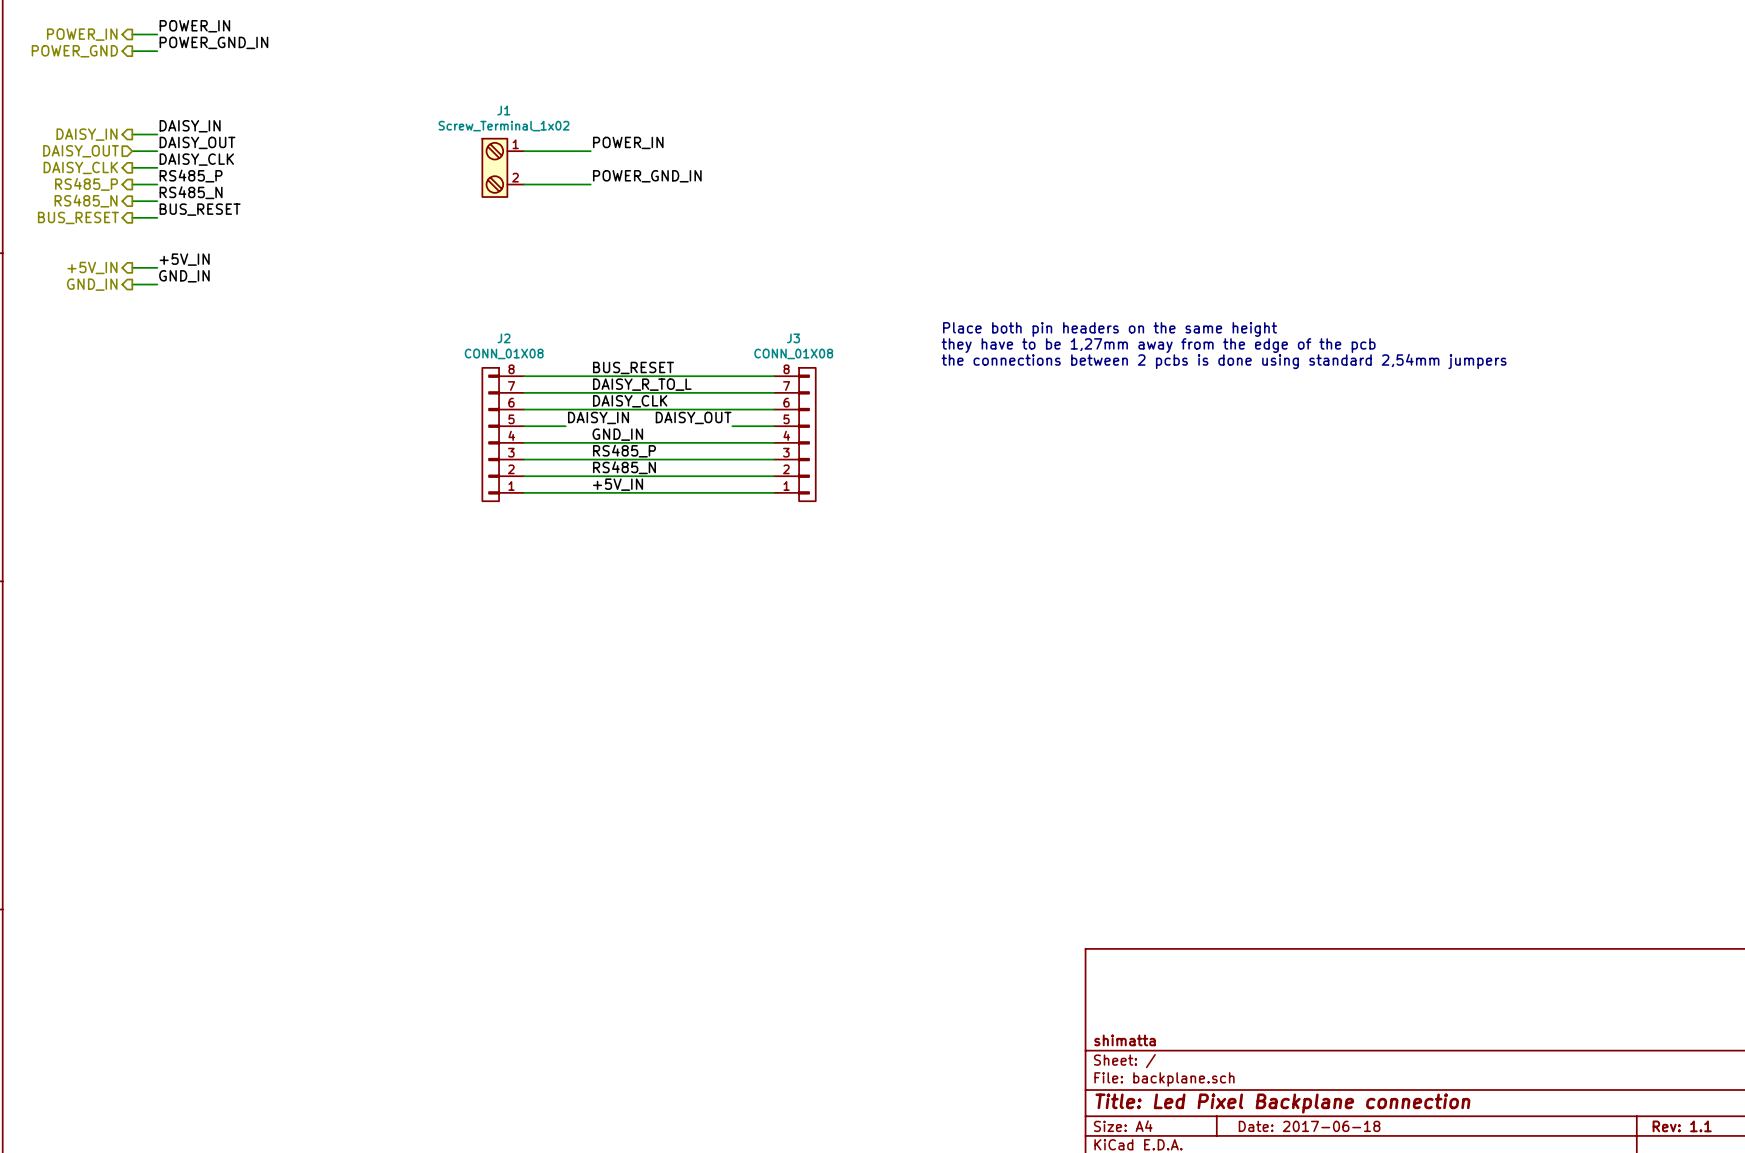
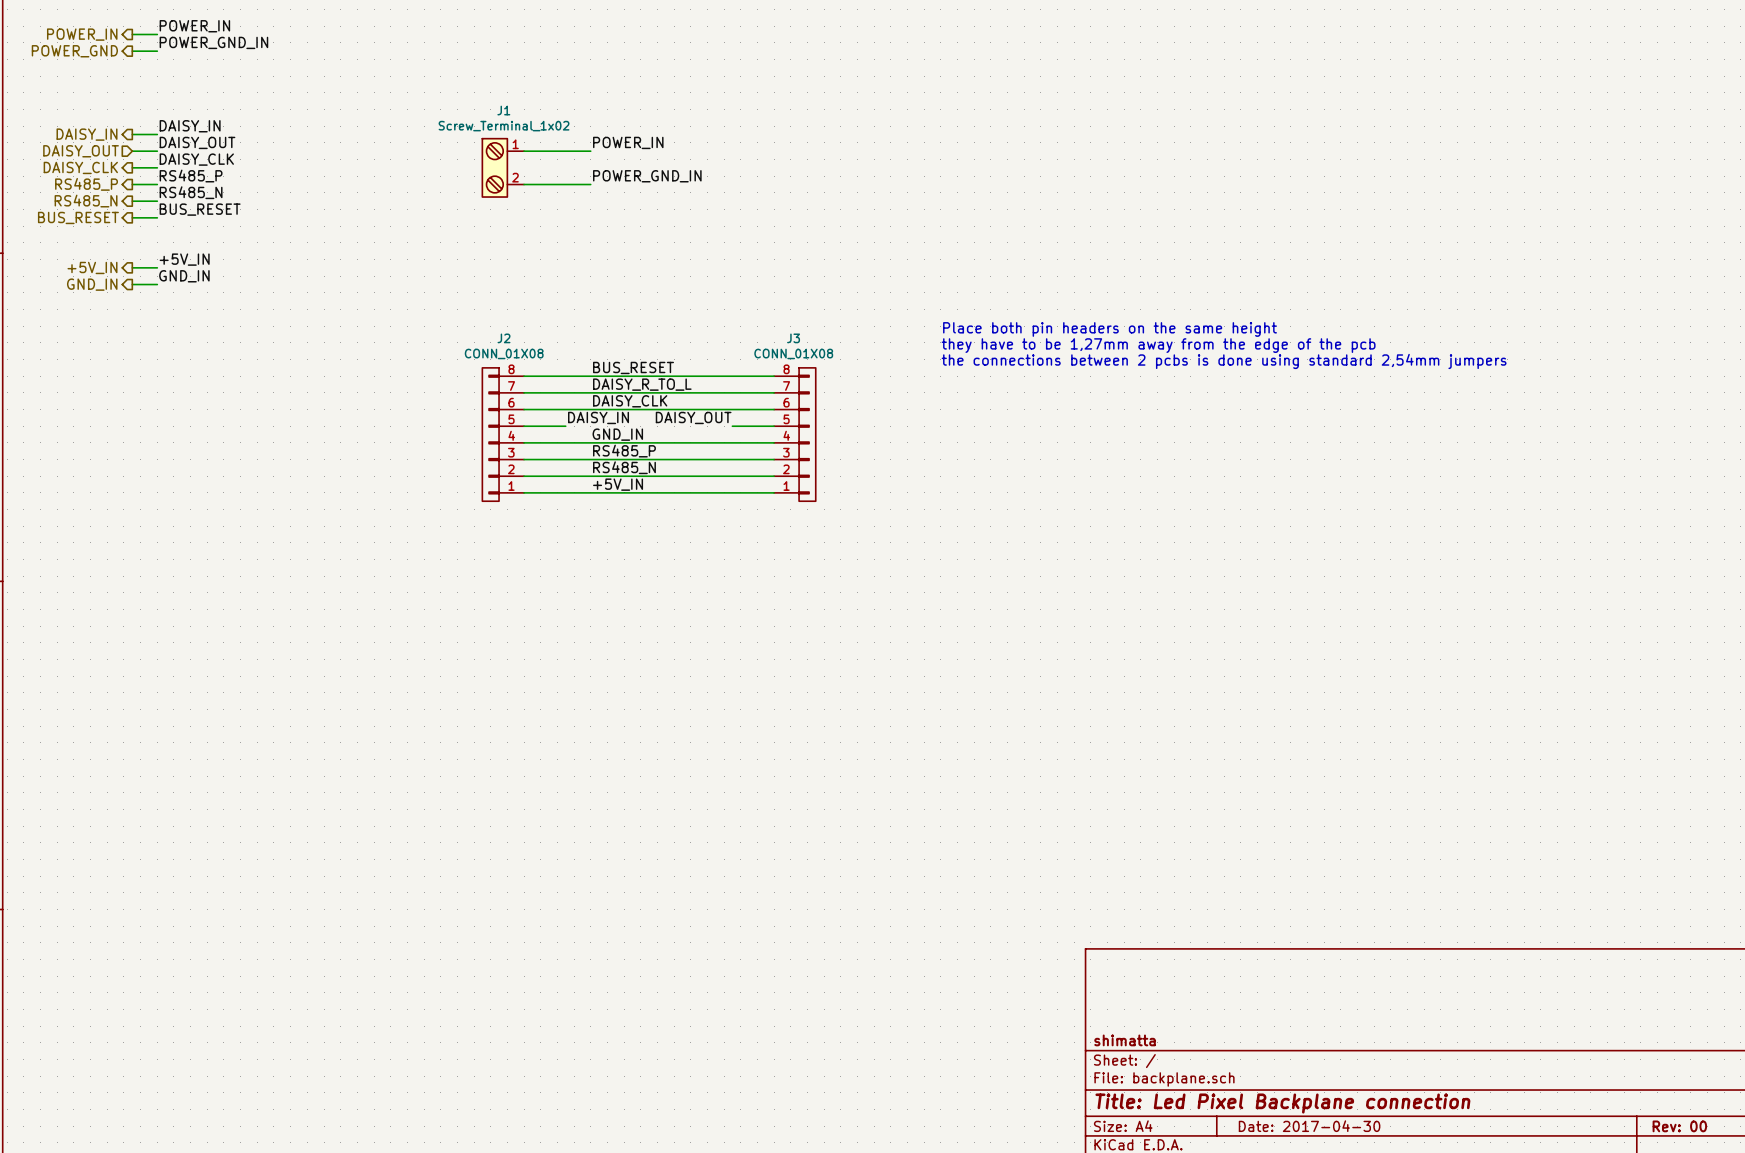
title block: Date: 2017-06-18 (1309, 1126) -> Date: 2017-04-30 (1309, 1126)
title block: Rev: 1.1 (1682, 1126) -> Rev: 00 (1679, 1126)

